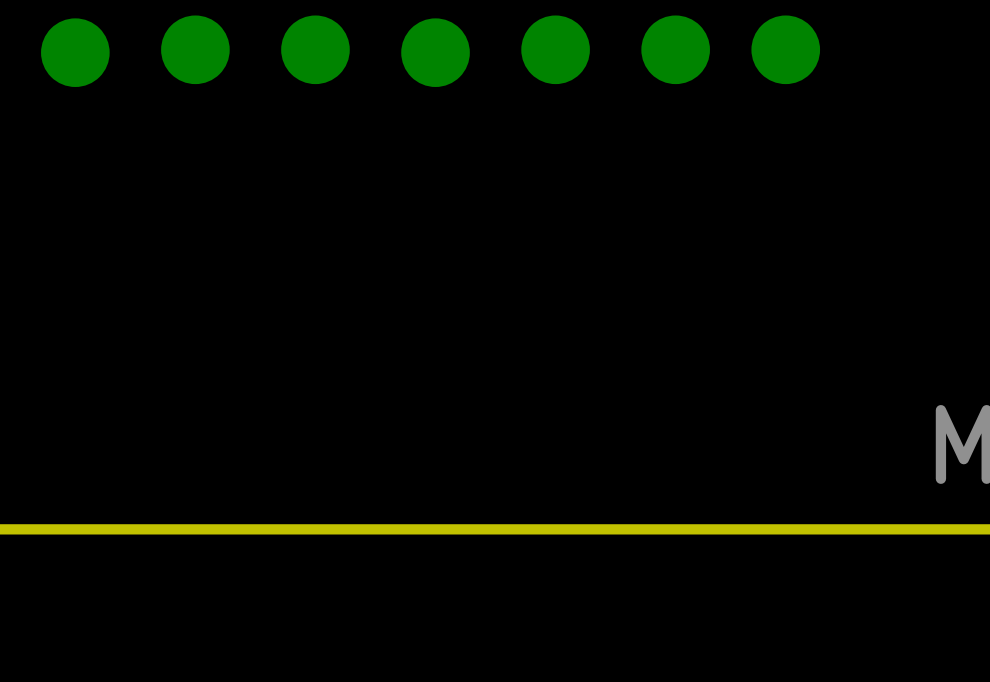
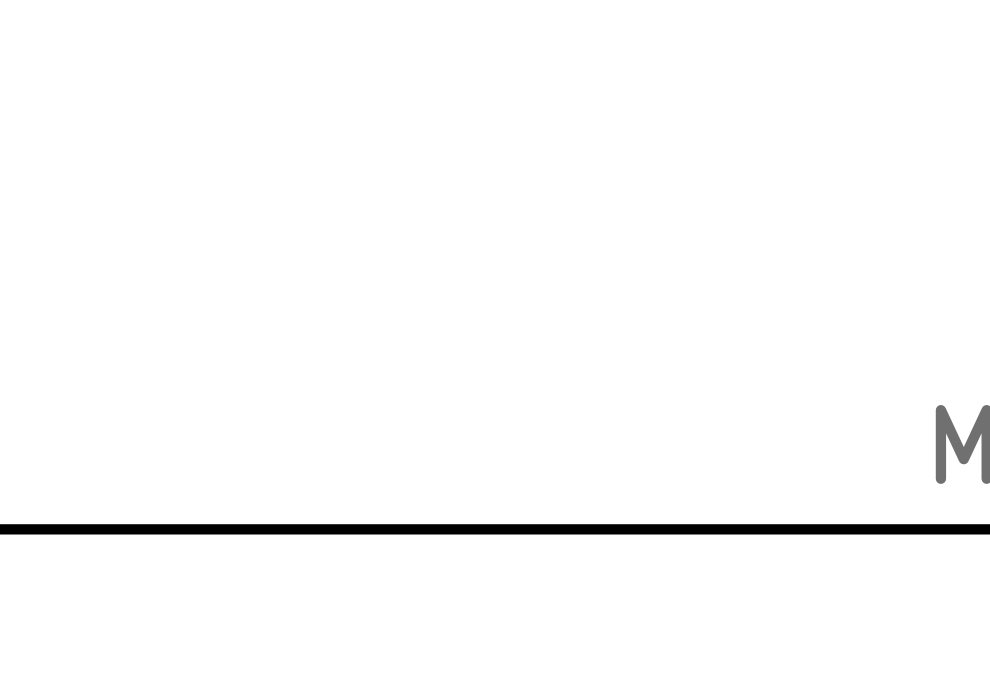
part: (195, 49) -> none
part: (315, 49) -> none
part: (555, 49) -> none
part: (675, 49) -> none
part: (785, 49) -> none
part: (75, 52) -> none
part: (435, 52) -> none

